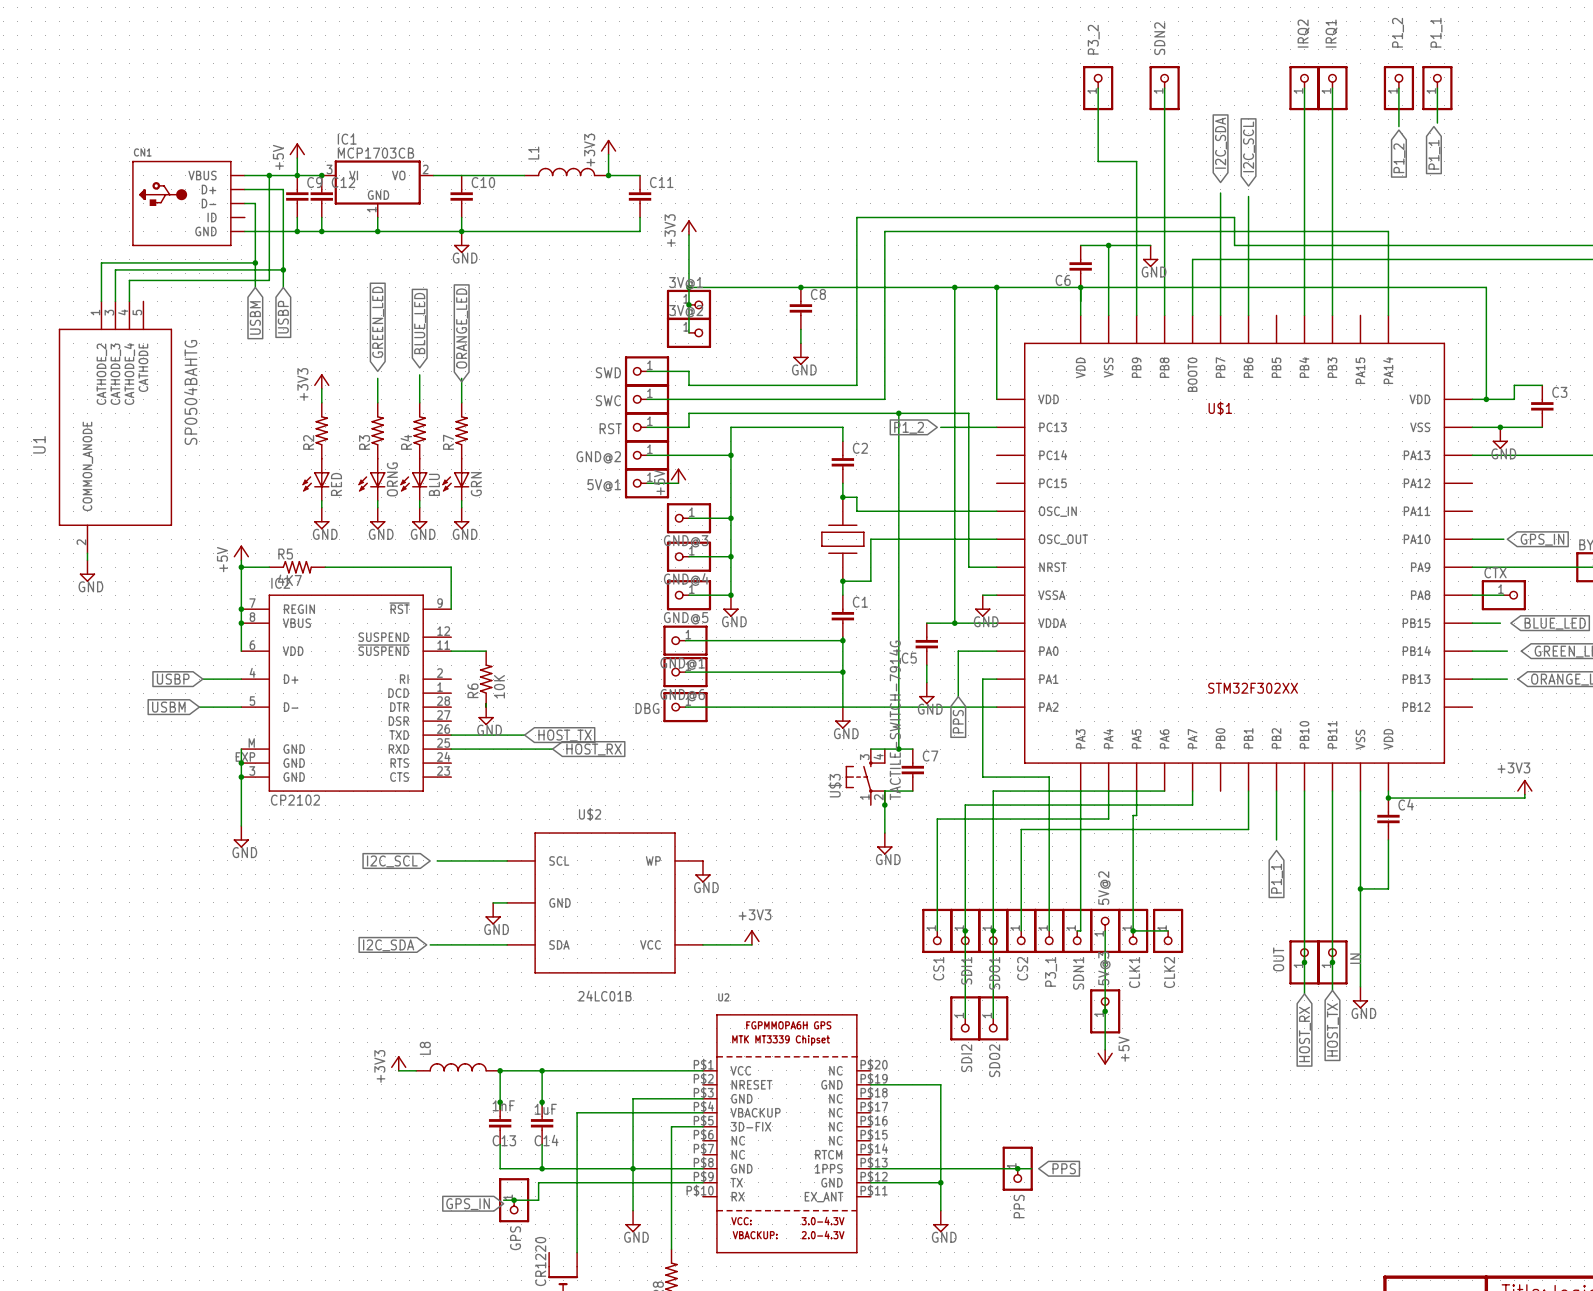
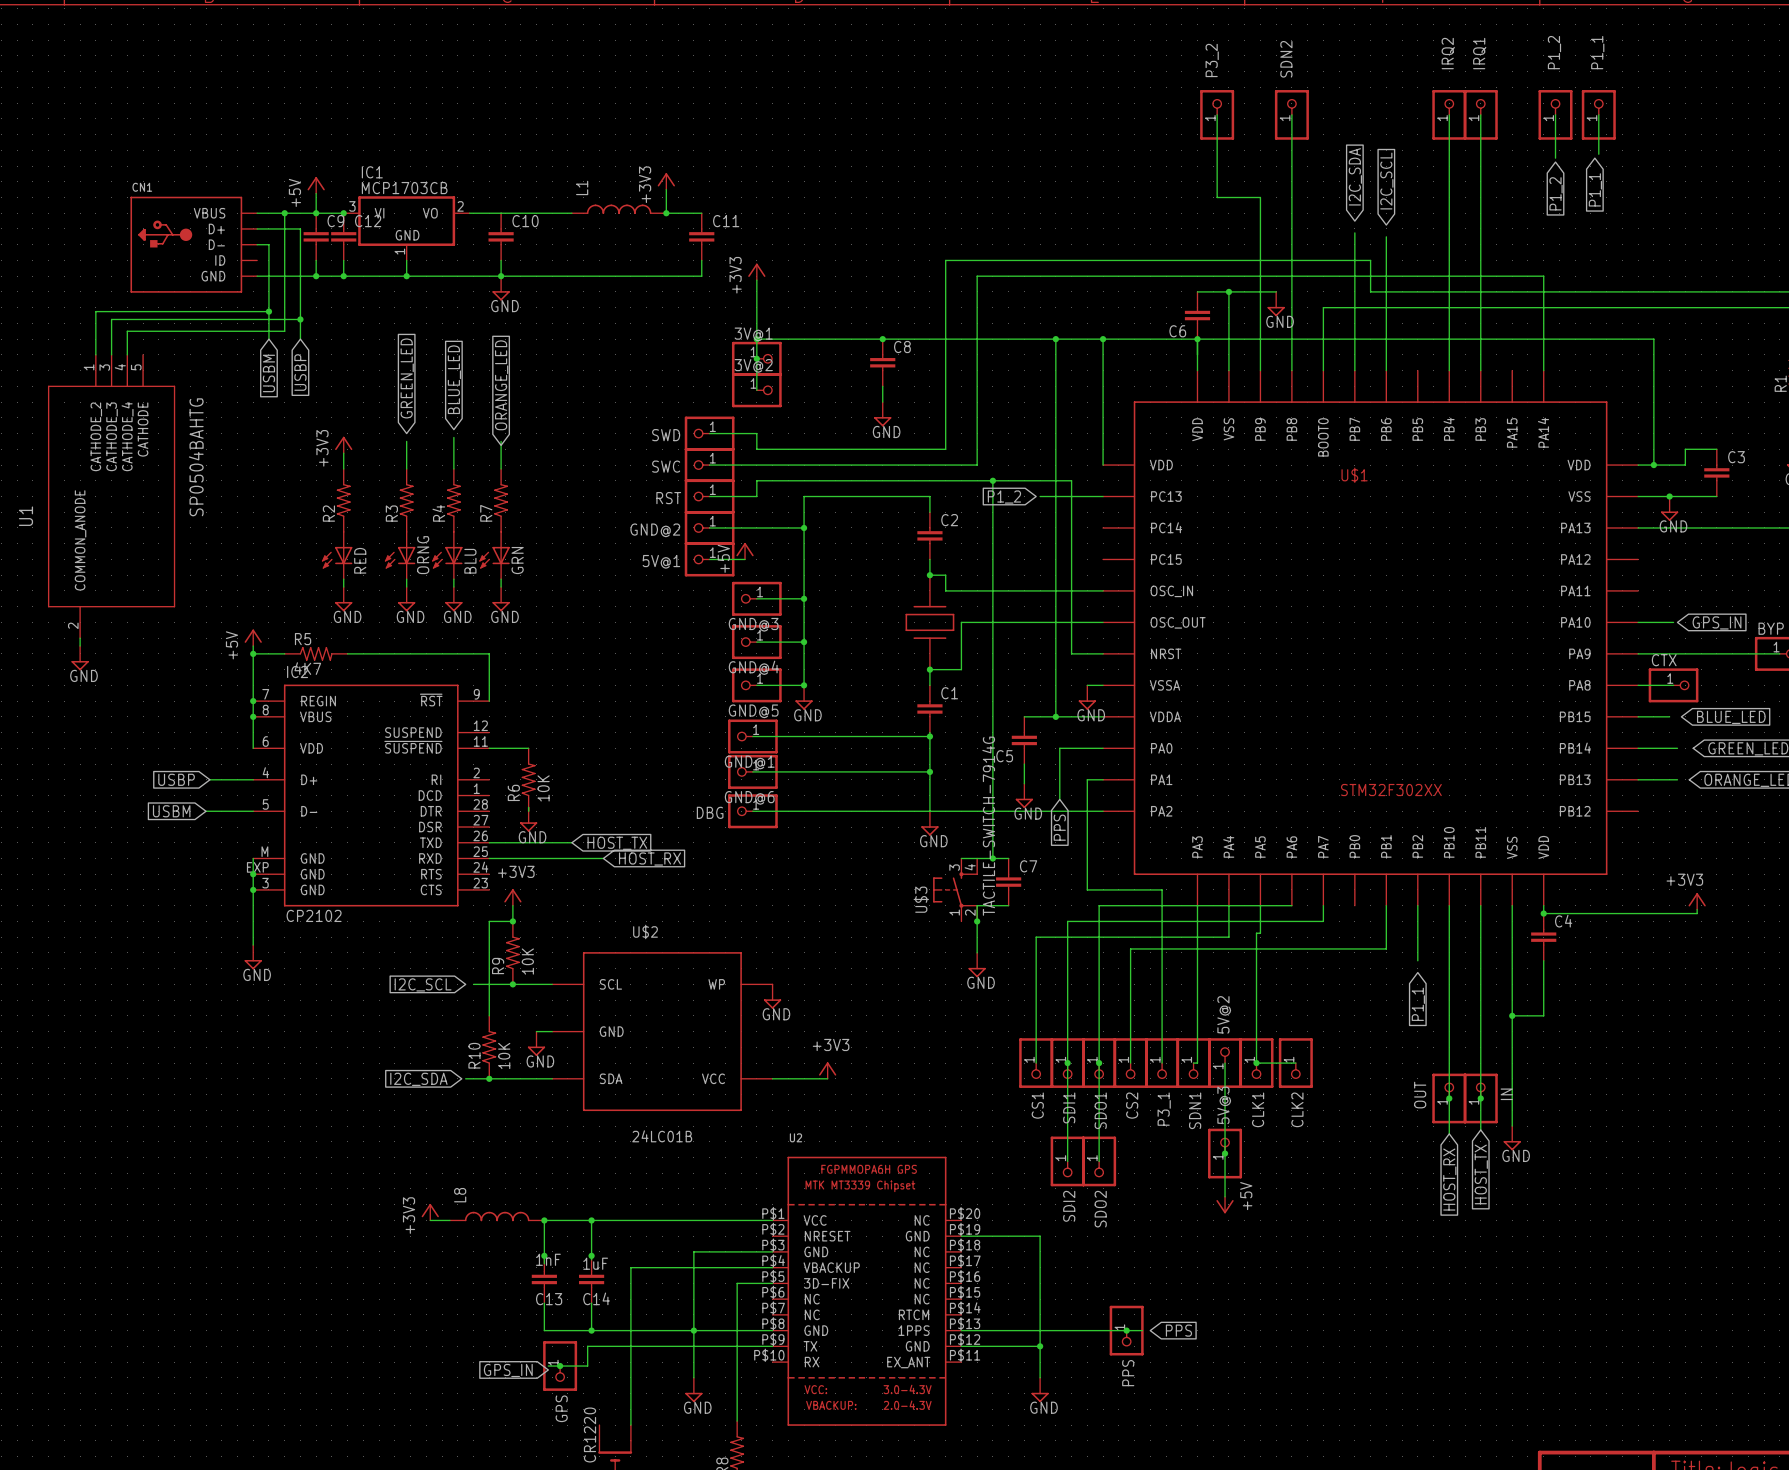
power symbol: none -> +3V3 (512, 897)
wire: none -> (512, 905) (512, 921) (489, 921) (489, 1015)
junction: none -> (512, 921)
R9: none -> 10K (512, 952)
junction: none -> (512, 984)
R10: none -> 10K (489, 1047)
junction: none -> (489, 1078)

